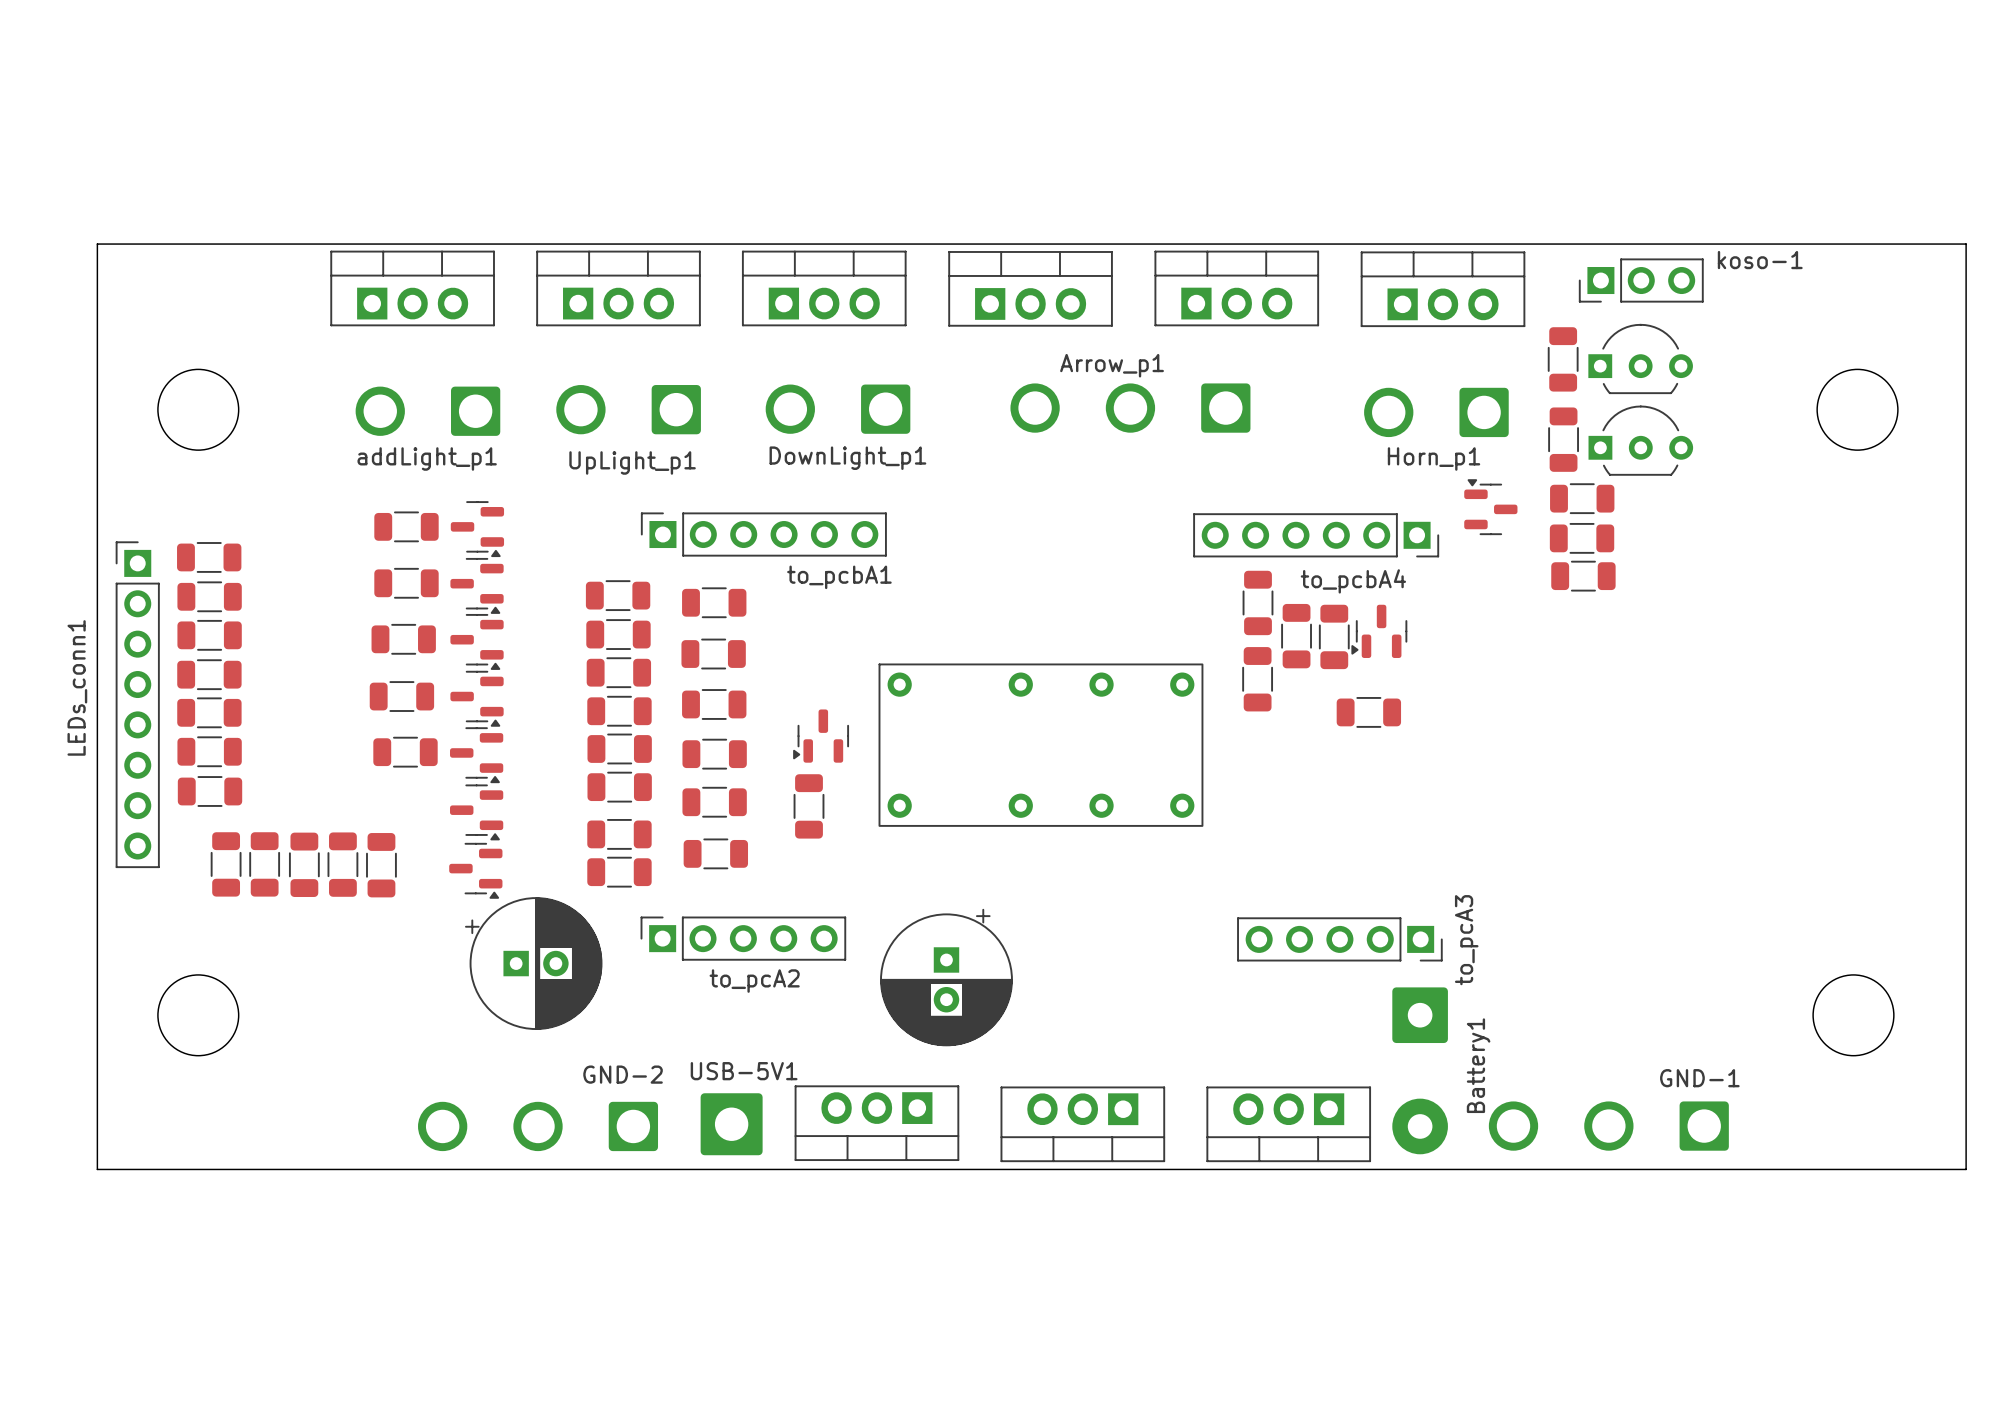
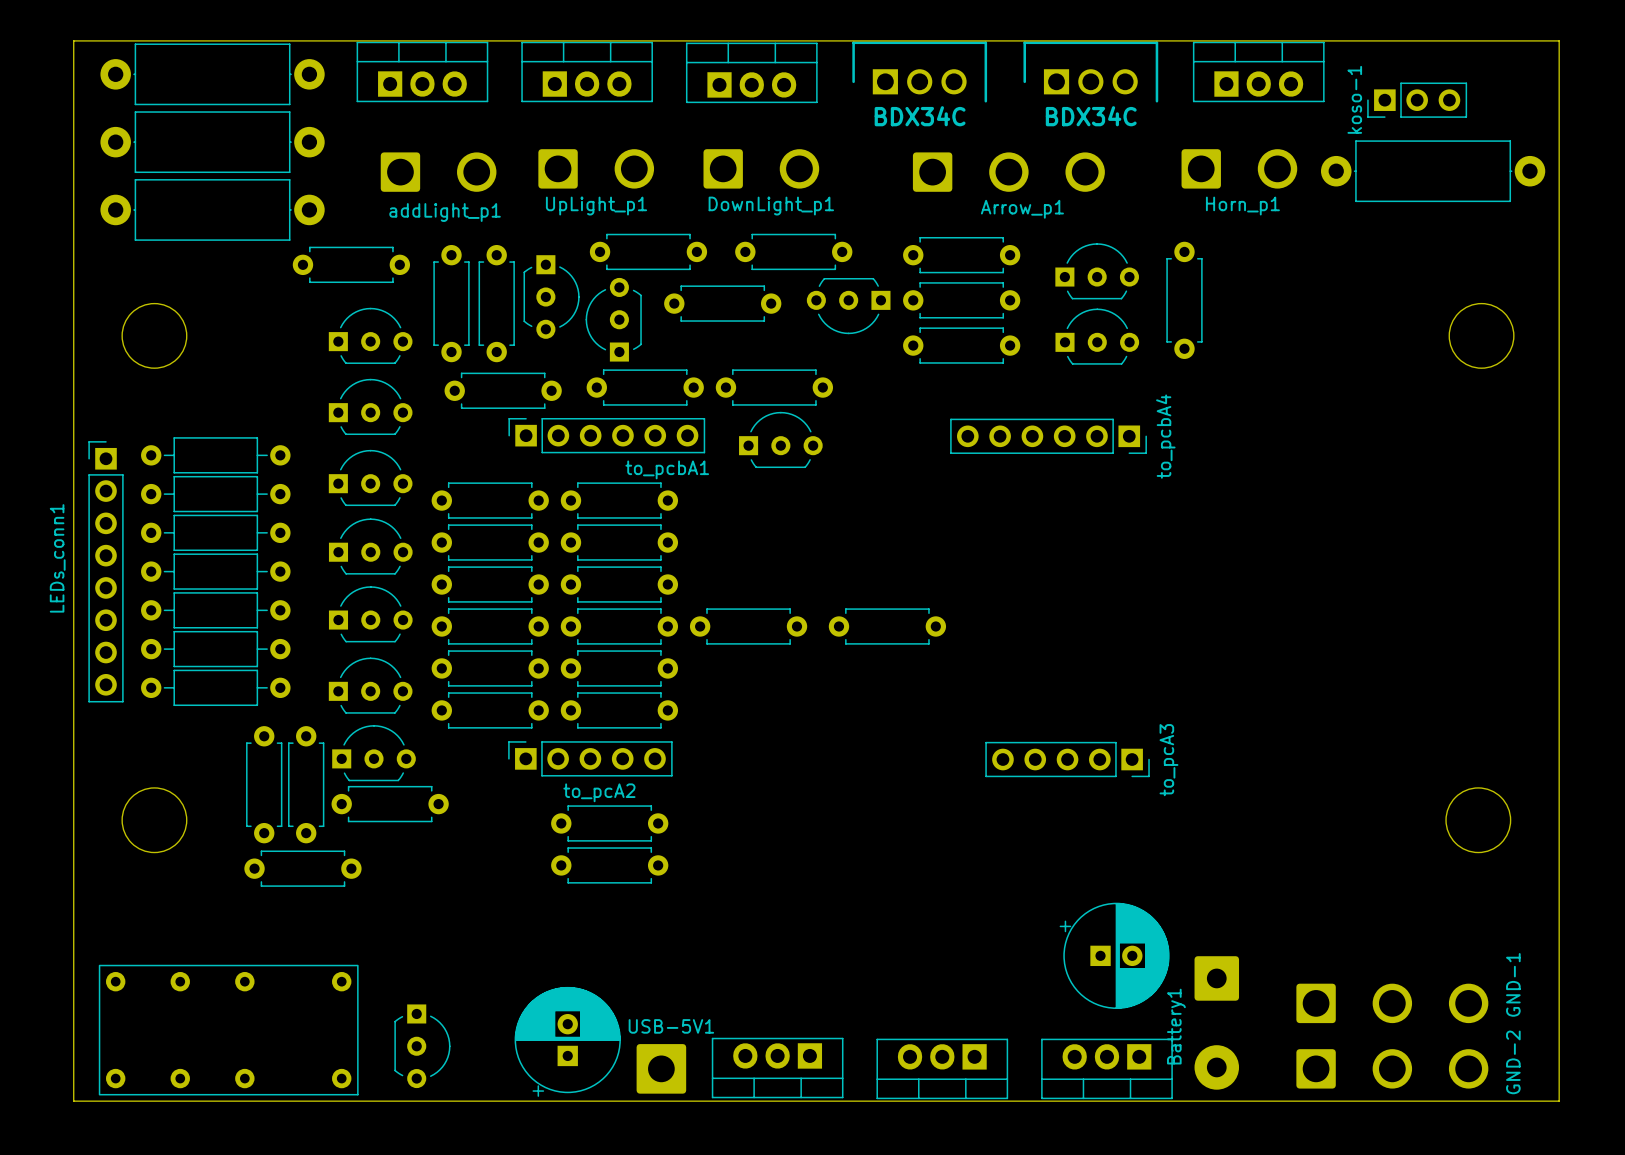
part: none -> (422, 71)
part: none -> (587, 71)
part: none -> BDX34C (919, 72)
part: none -> BDX34C (1090, 72)
part: none -> (1258, 71)
part: none -> (751, 72)
part: none -> (212, 74)
part: none -> (212, 142)
part: none -> (1433, 171)
board edge: (97, 244) (1966, 244) (1966, 1169) (97, 1169) -> (73, 203) (73, 40) (1559, 40) (1559, 1101) (73, 1101) (73, 943)
part: none -> (212, 209)
koso-1 name rotation: 0° (1760, 260) -> 90° counterclockwise (1354, 99)
koso-1 name position: koso-1 (1760, 260) -> koso-1 (1354, 99)
koso-1 position: (1641, 280) -> (1417, 100)
part: (412, 288) -> none
part: (618, 288) -> none
part: (824, 288) -> none
part: (1030, 288) -> none
part: (1236, 288) -> none
part: (1443, 289) -> none
part: none -> (648, 251)
part: none -> (793, 251)
part: none -> (961, 255)
part: none -> (351, 264)
part: none -> (1097, 271)
part: (1640, 358) -> none
part: (1563, 359) -> none
part: none -> (551, 297)
part: none -> (961, 300)
part: none -> (1184, 300)
part: none -> (451, 303)
part: none -> (496, 303)
part: none -> (722, 303)
part: none -> (848, 306)
part: none -> (613, 319)
Arrow_p1 rotation: 0° (1130, 408) -> 180° (1008, 172)
Arrow_p1 position: (1130, 408) -> (1008, 172)
part: none -> (370, 335)
UpLight_p1 rotation: 0° (628, 409) -> 180° (596, 168)
UpLight_p1 position: (628, 409) -> (596, 168)
DownLight_p1 rotation: 0° (838, 409) -> 180° (761, 168)
DownLight_p1 position: (838, 409) -> (761, 168)
part: none -> (1097, 336)
addLight_p1 rotation: 0° (427, 411) -> 180° (438, 172)
addLight_p1 position: (427, 411) -> (438, 172)
Horn_p1 rotation: 0° (1436, 412) -> 180° (1239, 168)
Horn_p1 position: (1436, 412) -> (1239, 168)
part: none -> (961, 345)
part: (1563, 439) -> none
part: (1640, 440) -> none
part: none -> (645, 387)
part: none -> (774, 387)
part: none -> (503, 390)
part: none -> (370, 406)
part: (1582, 498) -> none
part: (1490, 507) -> none
part: (406, 526) -> none
part: (477, 529) -> none
part: (1582, 538) -> none
part: none -> (780, 439)
part: (209, 557) -> none
part footprint: [450, 557, 504, 614] -> [328, 449, 413, 507]
part: none -> (215, 455)
part: (1583, 576) -> none
to_pcbA4 name rotation: 0° (1353, 581) -> 90° counterclockwise (1165, 436)
part: (406, 583) -> none
part: (618, 595) -> none
part: (209, 596) -> none
part: (714, 602) -> none
part: (1258, 602) -> none
part: none -> (215, 494)
part: none -> (490, 500)
part: none -> (619, 500)
part: (1379, 631) -> none
part: (618, 634) -> none
part: (209, 635) -> none
part: (1296, 636) -> none
part: (1334, 636) -> none
part: (403, 639) -> none
part: (477, 641) -> none
part: (713, 654) -> none
part: none -> (215, 532)
part footprint: [586, 657, 652, 689] -> [431, 524, 549, 561]
part: none -> (619, 542)
part: none -> (370, 546)
part: (209, 674) -> none
part: (1257, 679) -> none
part footprint: [587, 695, 652, 727] -> [431, 566, 549, 603]
part: (401, 696) -> none
part: (477, 698) -> none
part: none -> (215, 571)
part: (714, 704) -> none
part: (209, 712) -> none
part: (1368, 712) -> none
part: none -> (619, 584)
part footprint: [450, 727, 504, 784] -> [328, 586, 413, 643]
part: (821, 736) -> none
part: (1040, 745) -> none
part: (619, 748) -> none
part: (209, 751) -> none
part: none -> (215, 610)
part: (405, 752) -> none
part: (714, 754) -> none
part: none -> (490, 626)
part: none -> (619, 626)
part: none -> (748, 626)
part: none -> (887, 626)
part: (619, 787) -> none
part: (210, 791) -> none
part: none -> (215, 649)
part: (714, 802) -> none
part: (809, 806) -> none
part: (476, 812) -> none
part footprint: [587, 819, 652, 850] -> [431, 650, 549, 687]
part: none -> (619, 668)
part: none -> (370, 685)
part: none -> (215, 687)
part: (715, 853) -> none
part footprint: [587, 856, 652, 888] -> [431, 692, 549, 729]
part: (226, 864) -> none
part: (264, 864) -> none
part: (304, 864) -> none
part: (342, 864) -> none
part: (381, 865) -> none
part: (475, 870) -> none
part: none -> (619, 710)
part: none -> (374, 753)
part: (533, 963) -> none
part: none -> (264, 784)
part: none -> (306, 784)
part: (946, 977) -> none
part: none -> (390, 804)
part: none -> (609, 823)
Battery1 name position: Battery1 (1478, 1065) -> Battery1 (1176, 1026)
Battery1 position: (1420, 1070) -> (1216, 1022)
part: none -> (609, 865)
GND-2 name position: GND-2 (623, 1074) -> GND-2 (1513, 1062)
part: none -> (302, 868)
GND-1 name position: GND-1 (1699, 1078) -> GND-1 (1513, 984)
part: (876, 1123) -> none
USB-5V1 position: (731, 1124) -> (661, 1068)
part: (1082, 1124) -> none
part: (1288, 1124) -> none
GND-2 rotation: 0° (538, 1126) -> 180° (1392, 1068)
GND-2 position: (538, 1126) -> (1392, 1068)
GND-1 rotation: 0° (1608, 1126) -> 180° (1392, 1003)
GND-1 position: (1608, 1126) -> (1392, 1003)
part: none -> (1114, 955)
part: none -> (228, 1030)
part: none -> (567, 1041)
part: none -> (422, 1046)
part: none -> (777, 1068)
part: none -> (942, 1068)
part: none -> (1106, 1068)

